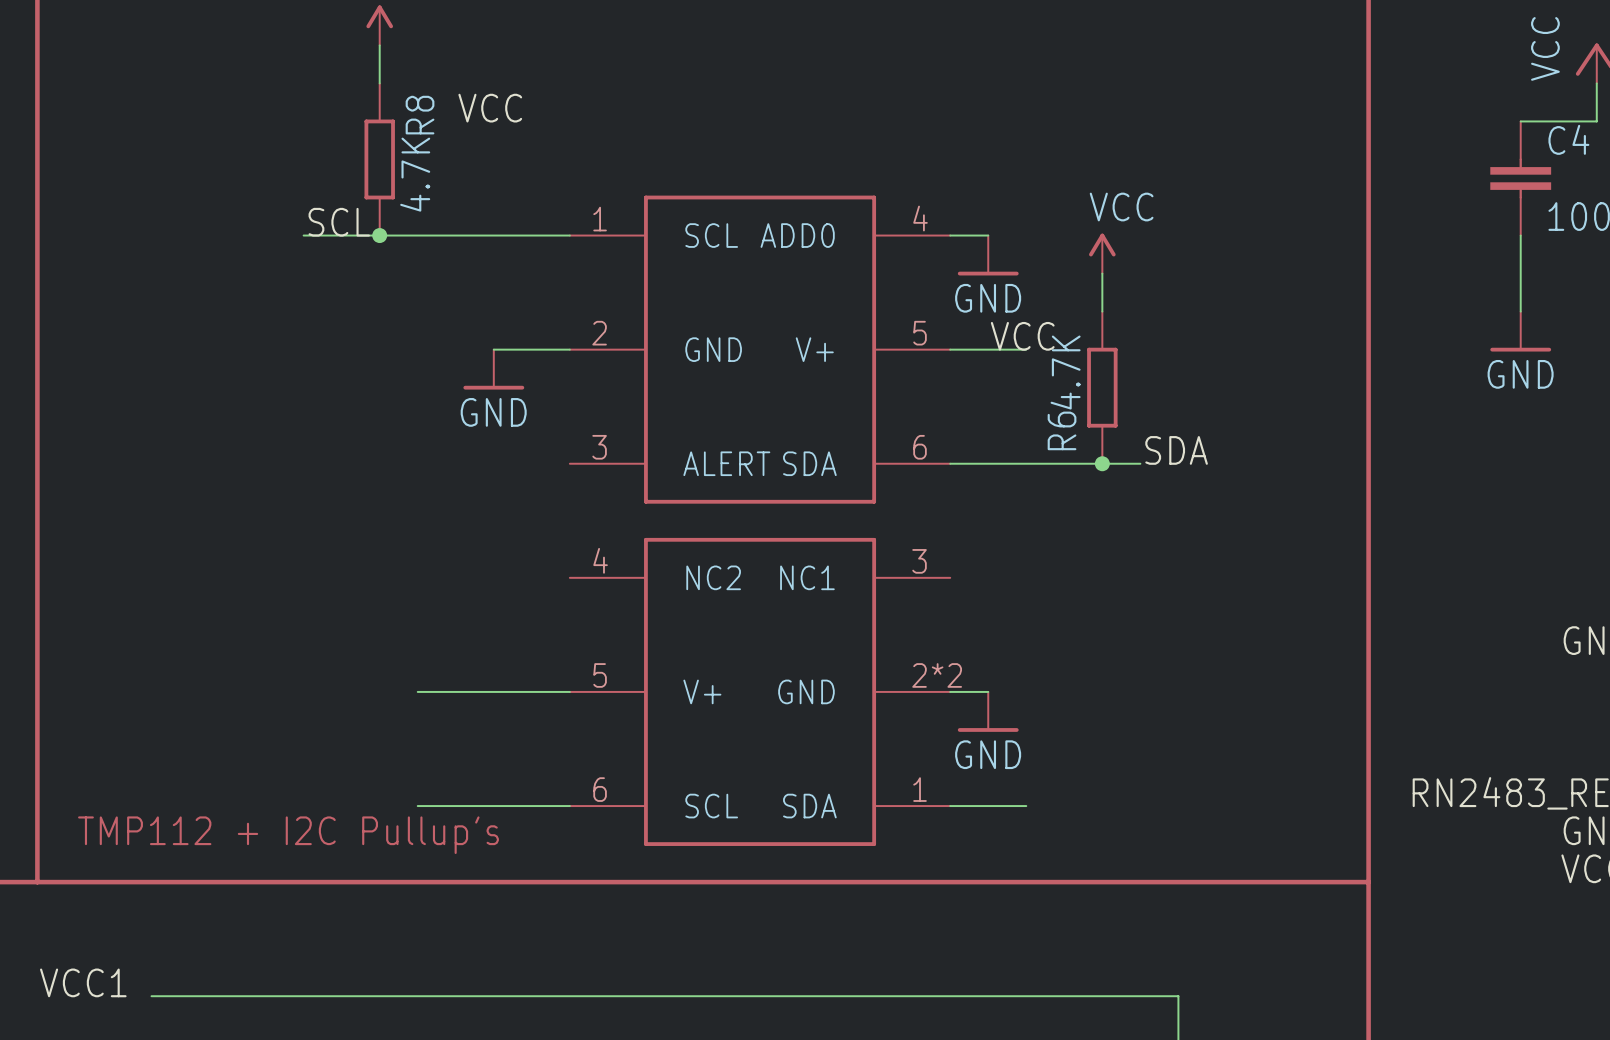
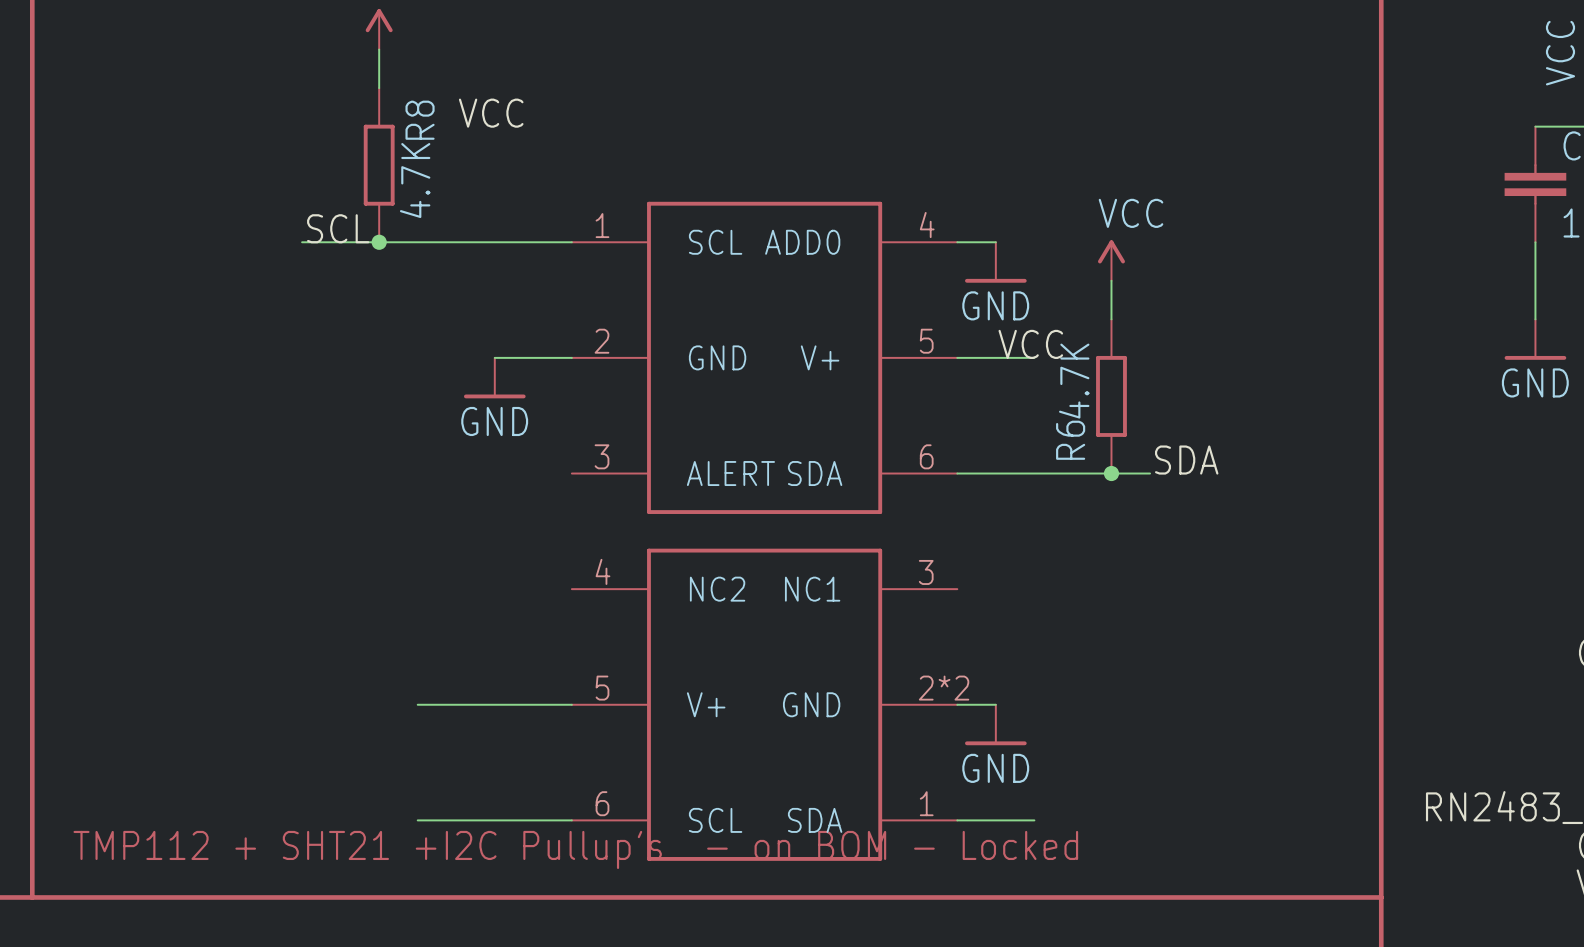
text: TMP112 + I2C Pullup's (288, 835) -> TMP112 + SHT21 +I2C Pullup's - on BOM - Locked (575, 849)

